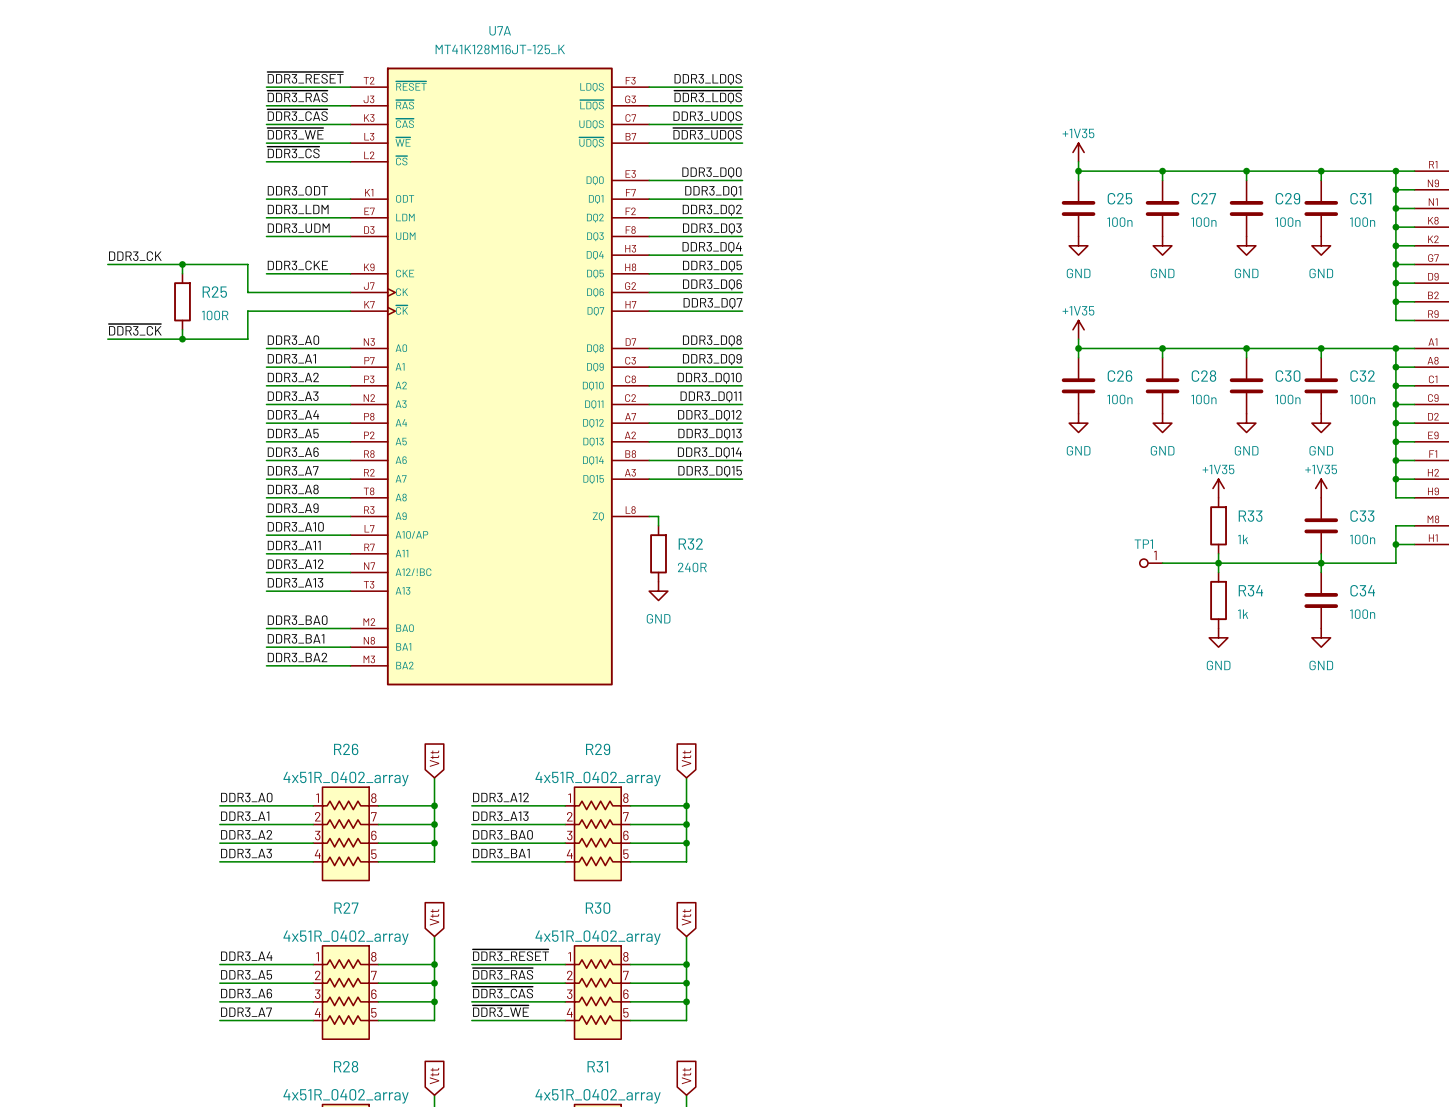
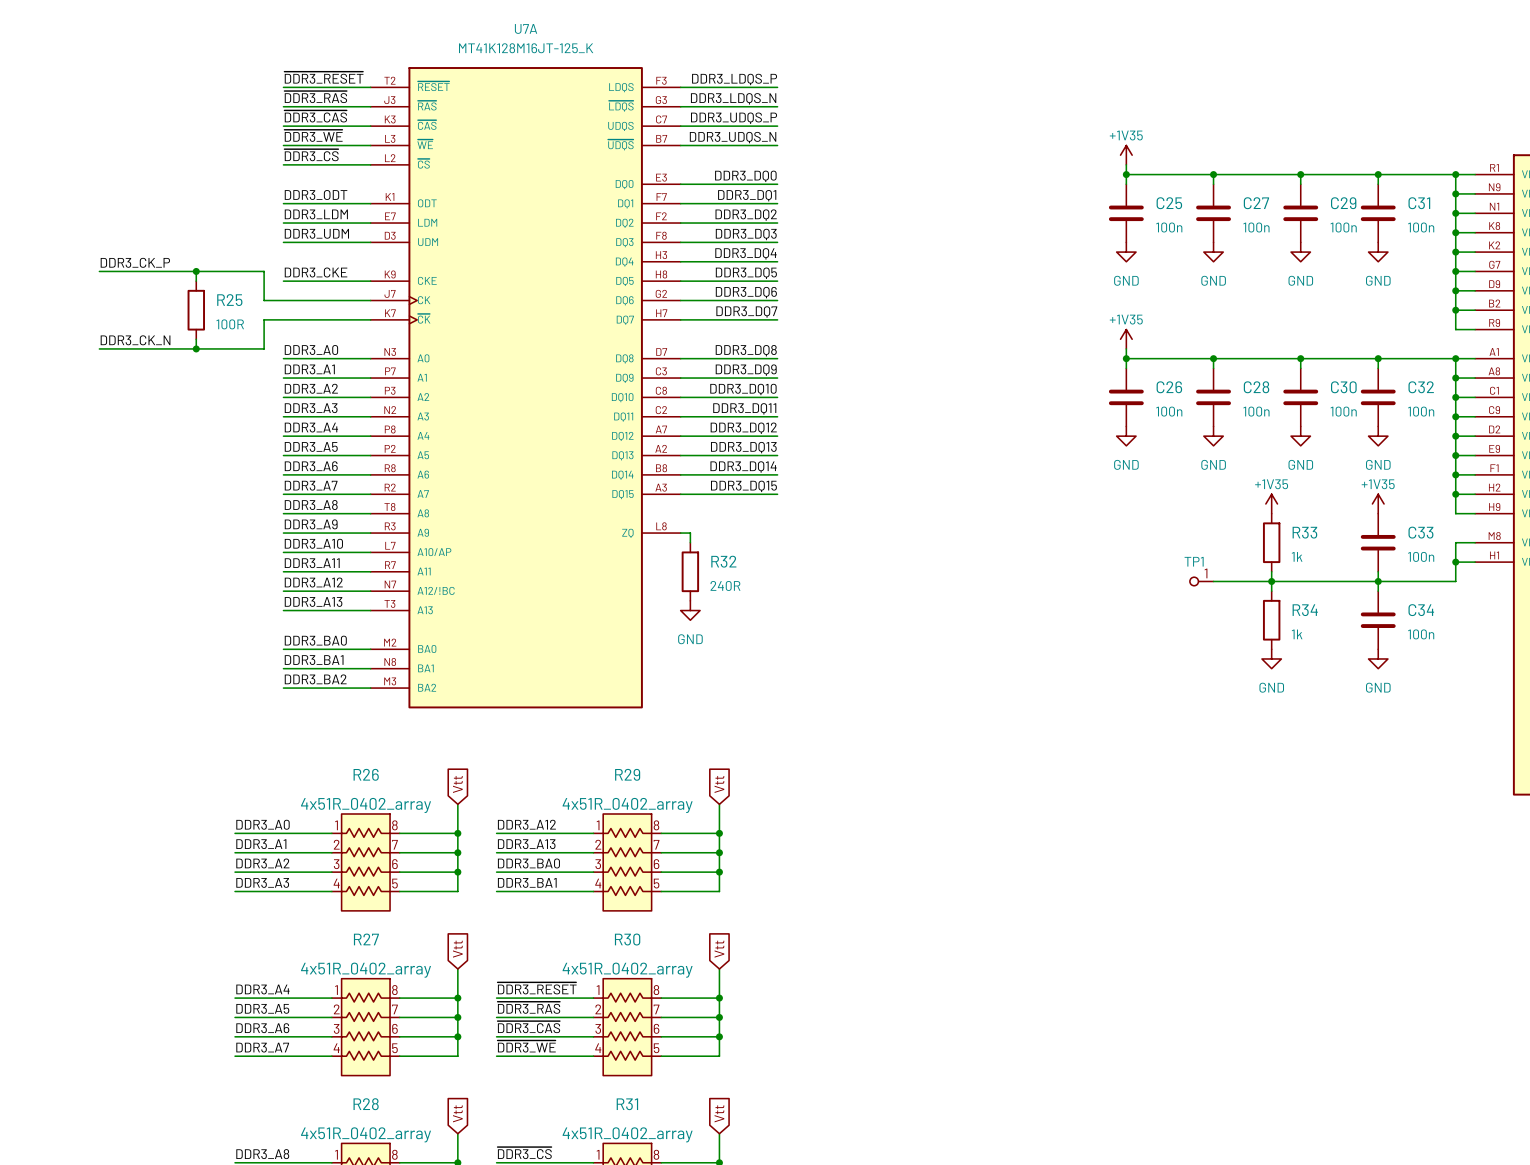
label: DDR3_LDQS (708, 79) -> DDR3_LDQS_P (734, 79)
label: ~{DDR3_LDQS} (708, 97) -> DDR3_LDQS_N (733, 98)
label: DDR3_UDQS (707, 116) -> DDR3_UDQS_P (734, 118)
label: ~{DDR3_UDQS} (707, 134) -> DDR3_UDQS_N (733, 137)
label: DDR3_CK (135, 256) -> DDR3_CK_P (135, 262)
wire: none -> (99, 271) (118, 271)
label: ~{DDR3_CK} (135, 329) -> DDR3_CK_N (135, 340)
wire: none -> (99, 348) (118, 348)

